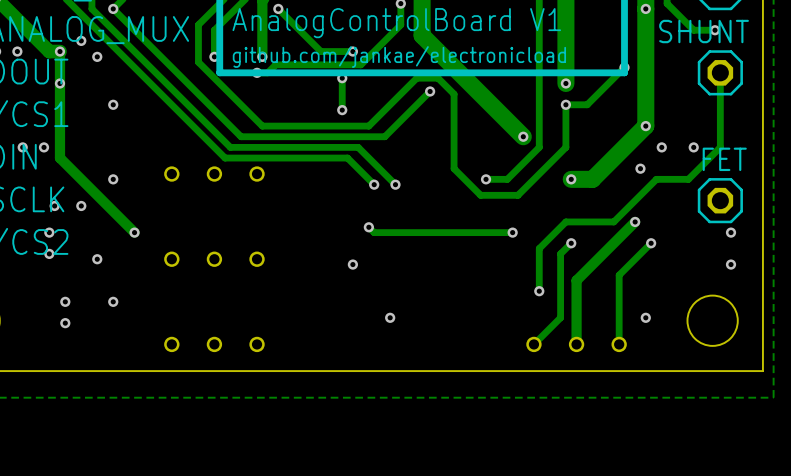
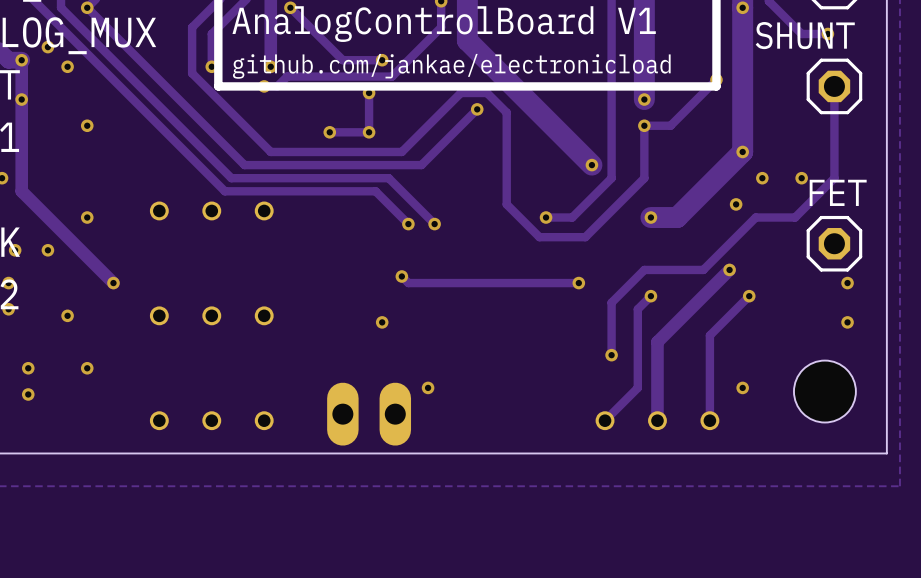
via: none -> (329, 132)
track: none -> (369, 132) (329, 132)
part: none -> (369, 414)

